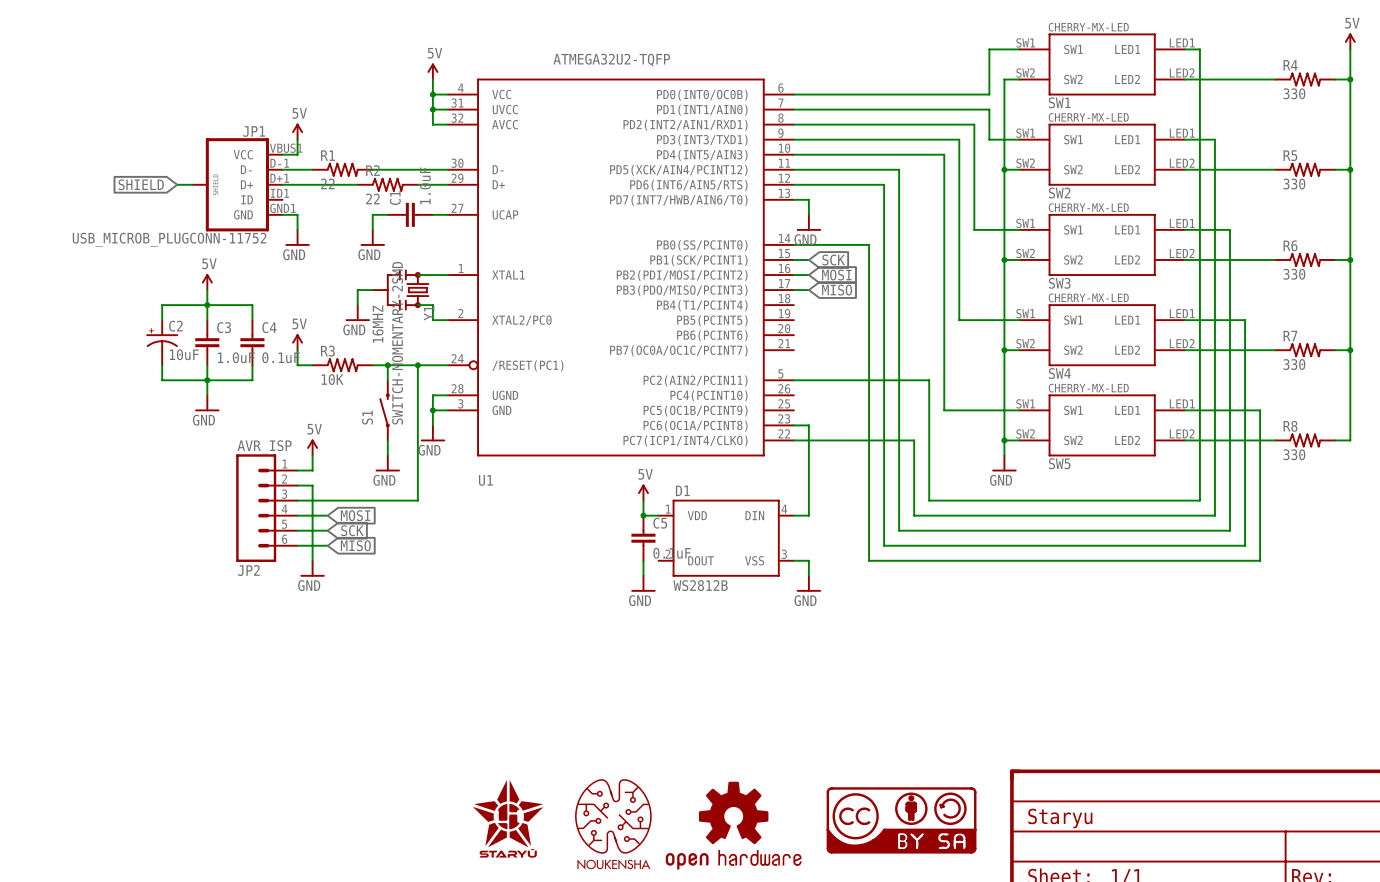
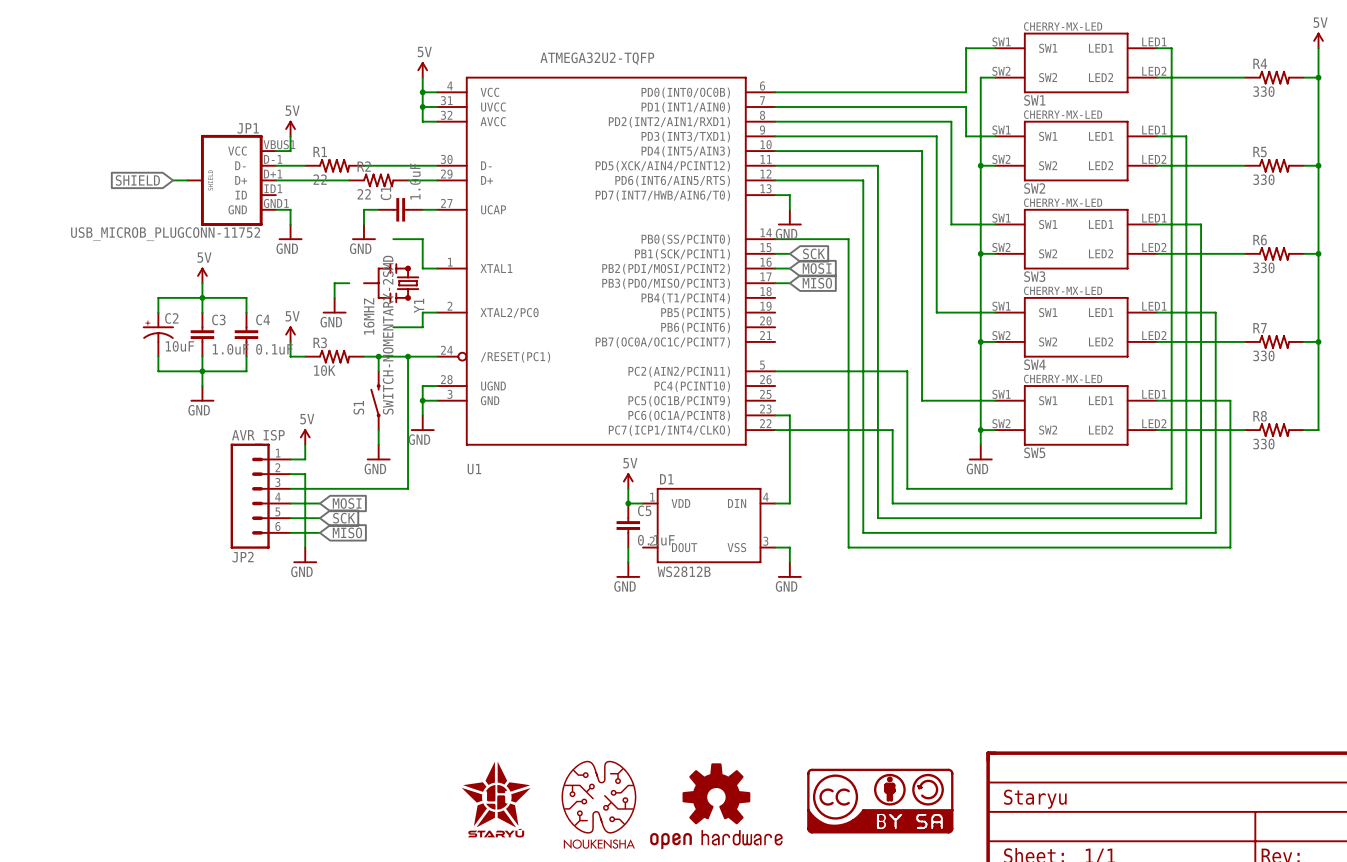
wire: (417, 275) (432, 275) -> (393, 239) (422, 239) (422, 268)
wire: (372, 290) (357, 290) (357, 305) -> (349, 283) (334, 283) (334, 297)
wire: (417, 305) (432, 305) (432, 320) -> (393, 327) (422, 327) (422, 312)
power symbol position: GND (357, 312) -> GND (334, 305)

